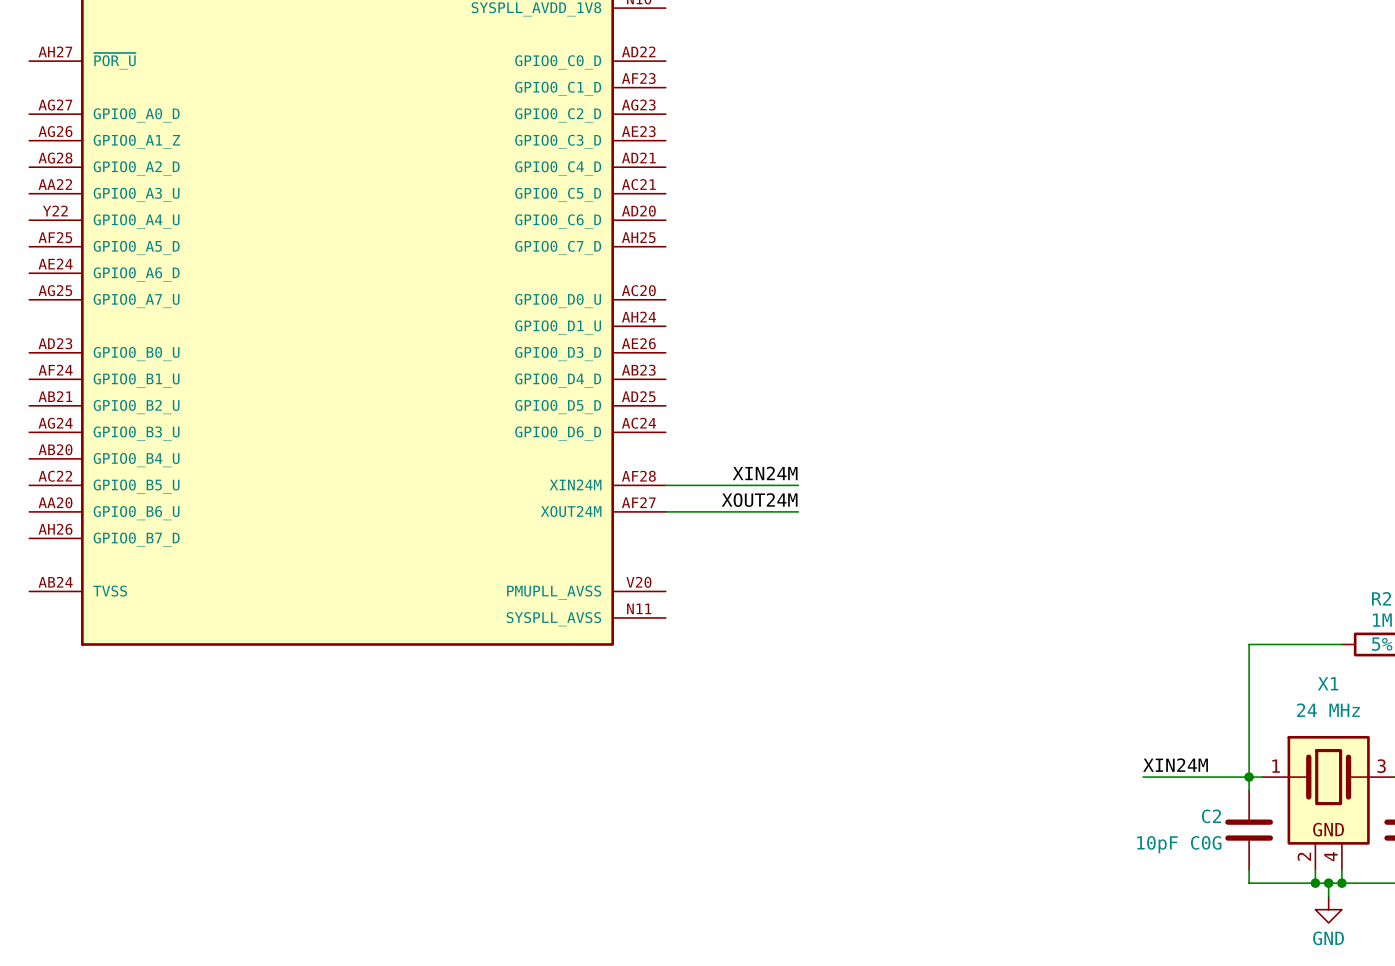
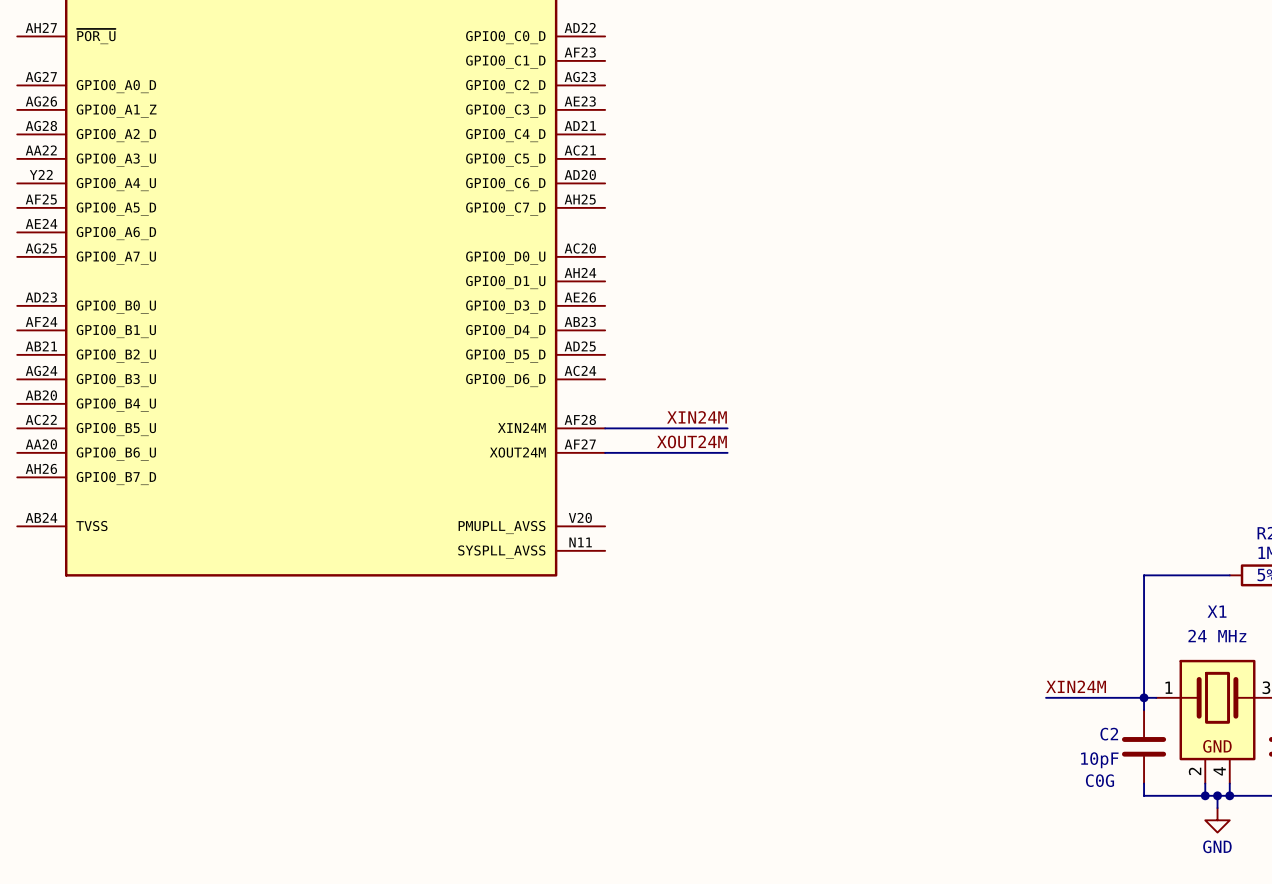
C2 value: 10pF C0G (1179, 844) -> 10pF (1099, 760)
C2 text: none -> C0G (1099, 780)

